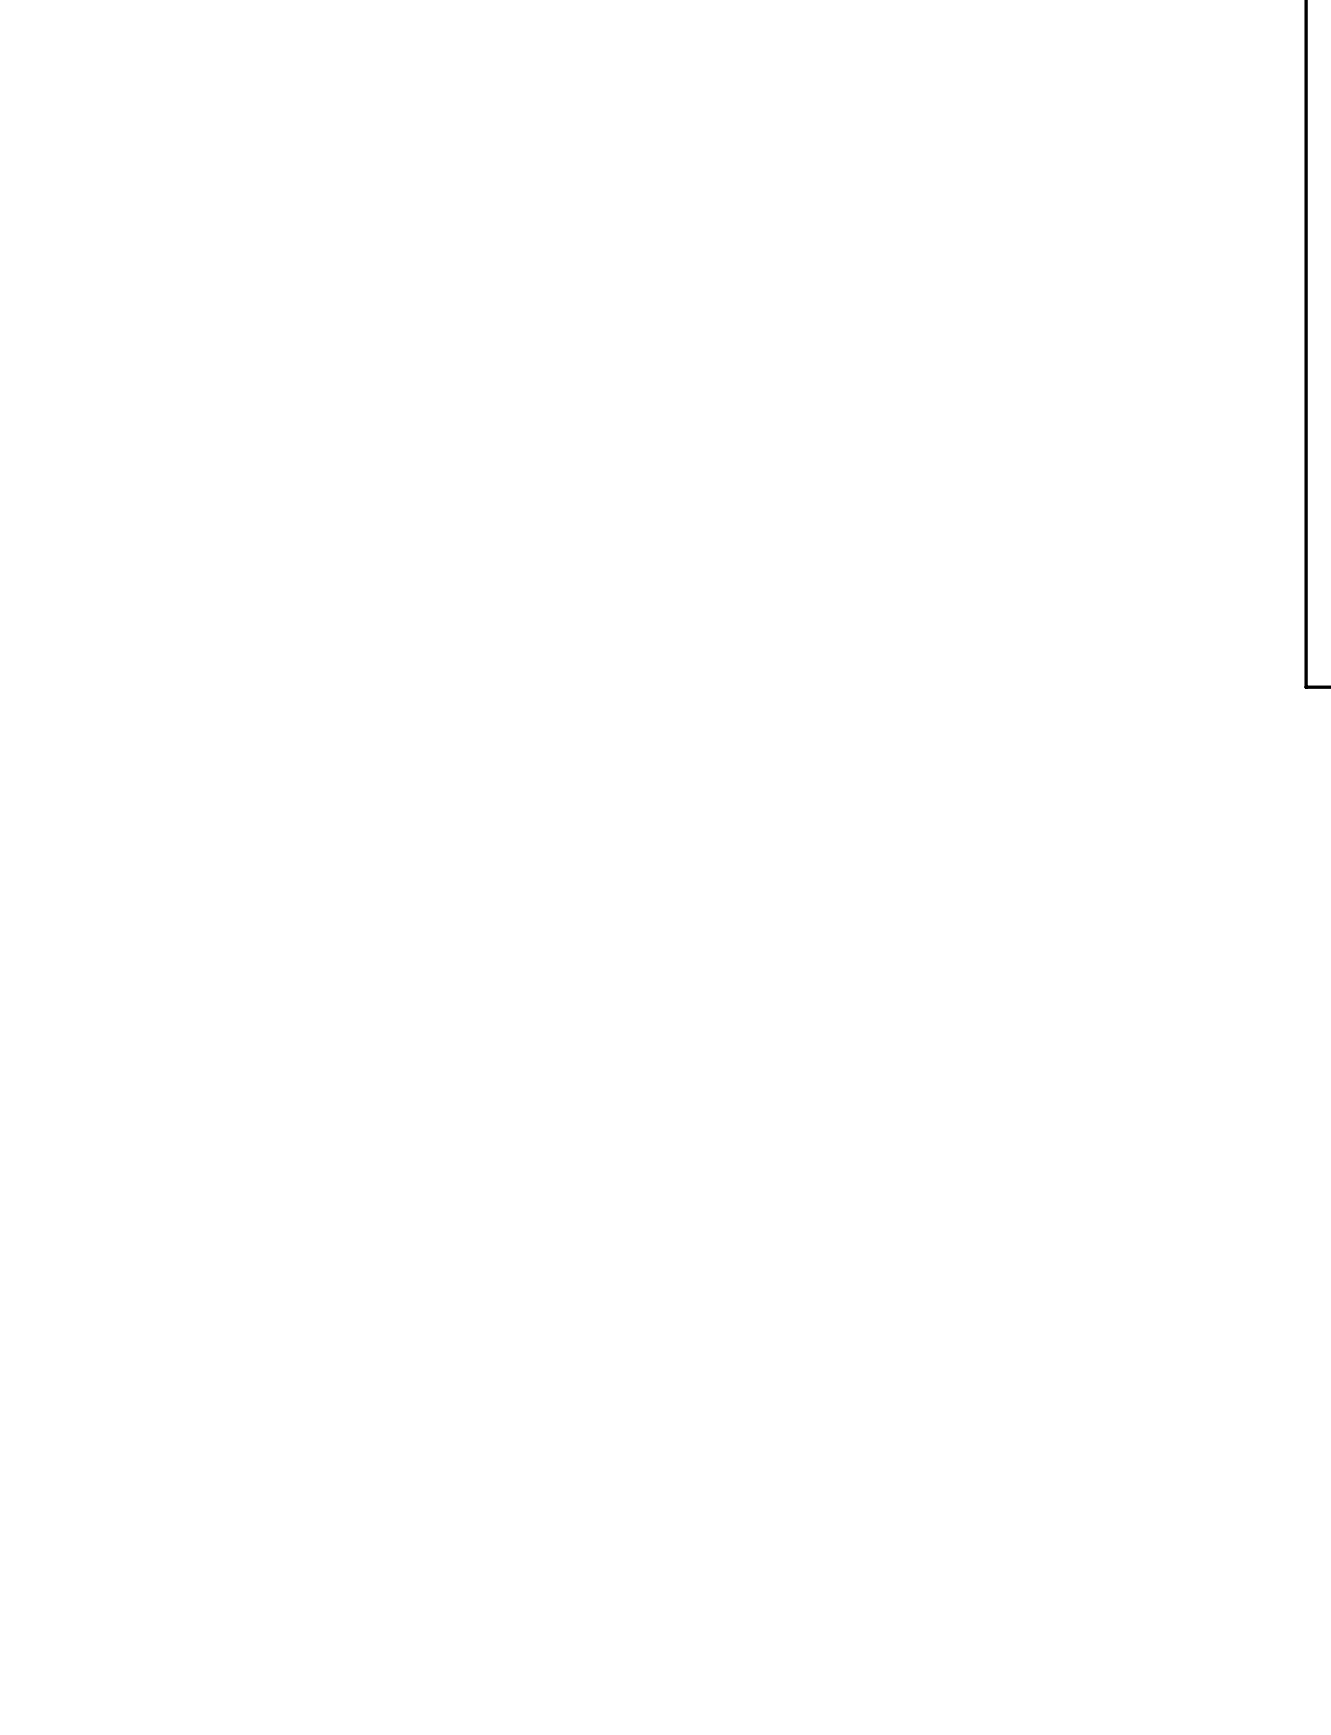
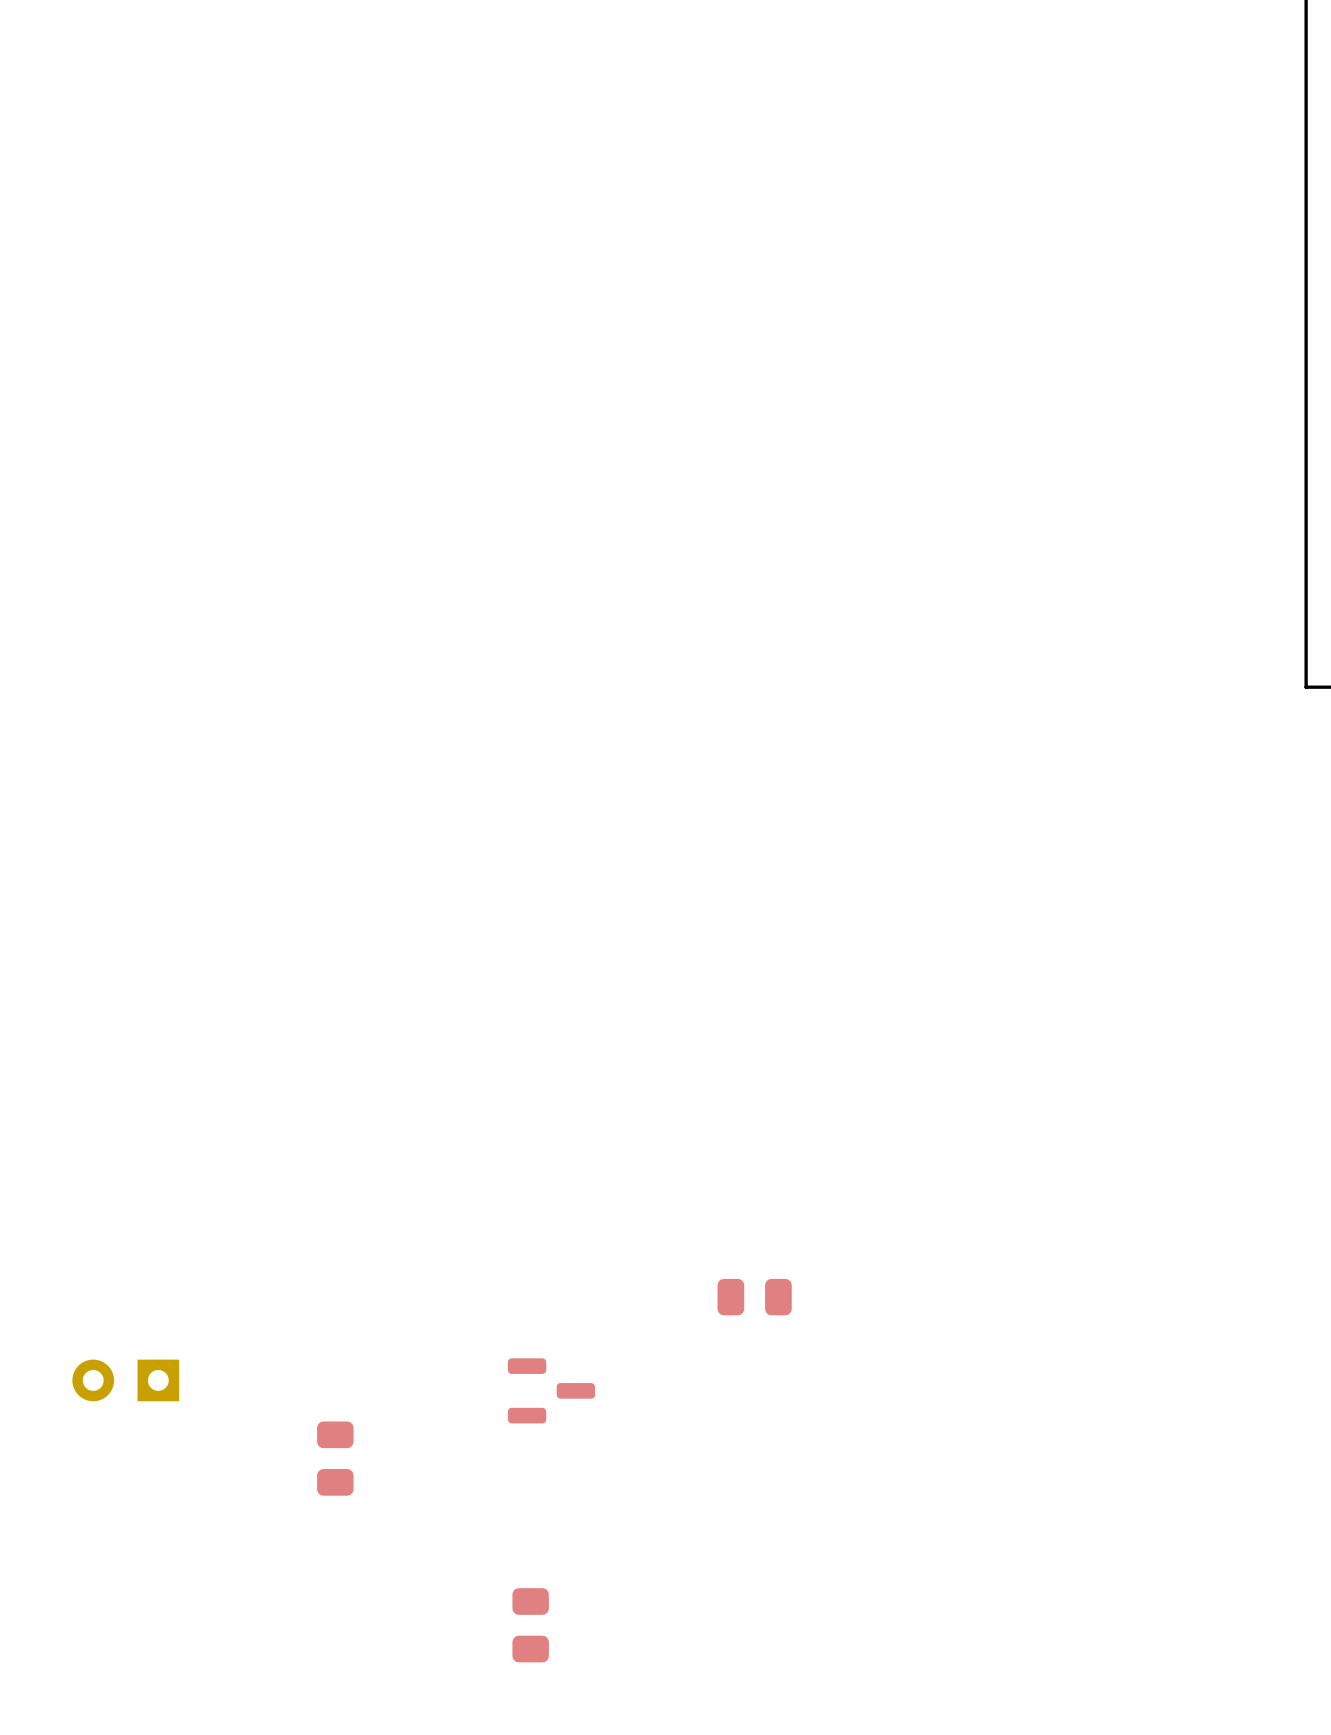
part: none -> (754, 1297)
part: none -> (125, 1380)
part: none -> (551, 1390)
part: none -> (335, 1458)
part: none -> (530, 1625)

